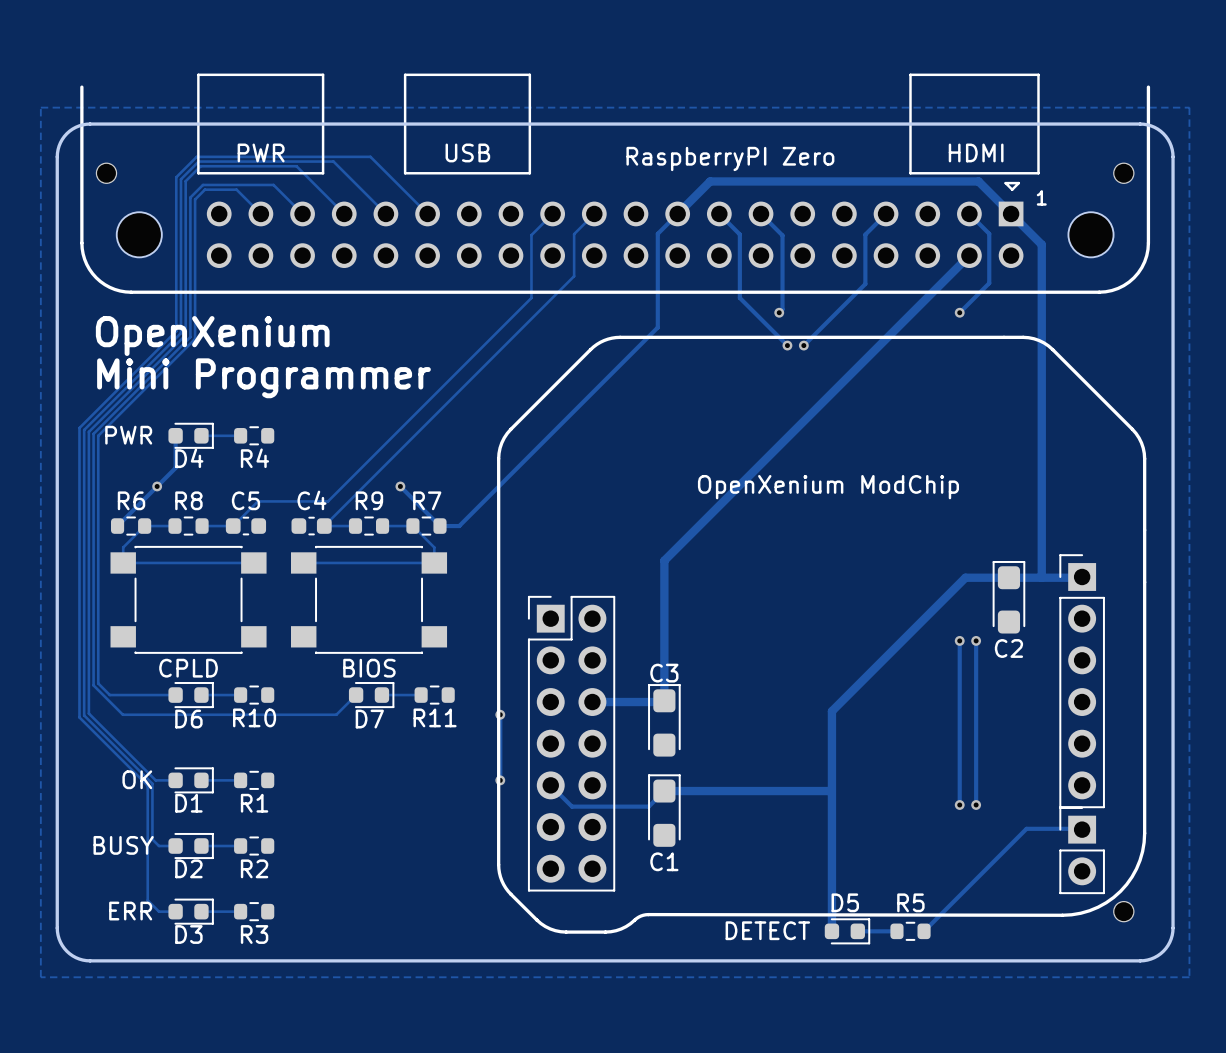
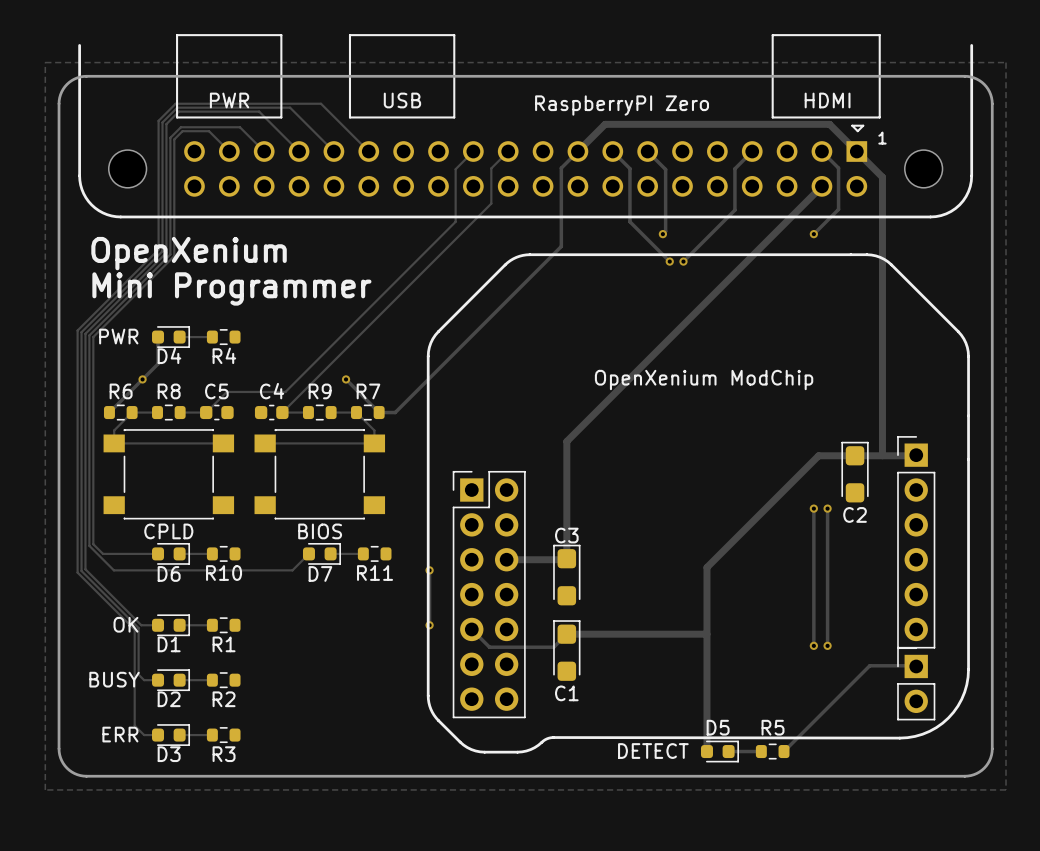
part: (106, 173) -> none
part: (1123, 173) -> none
part: (1123, 911) -> none

